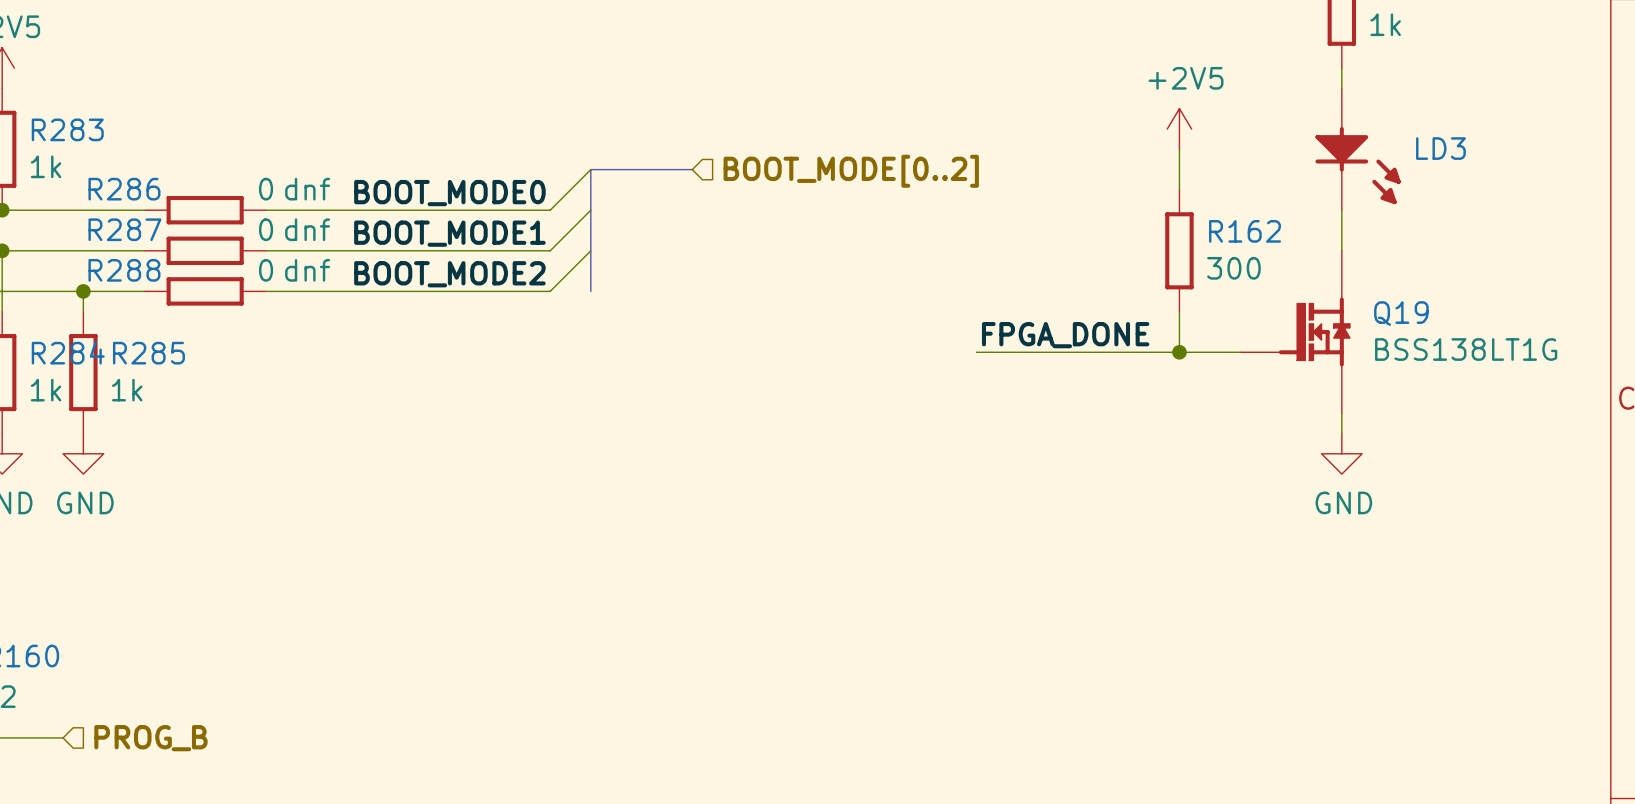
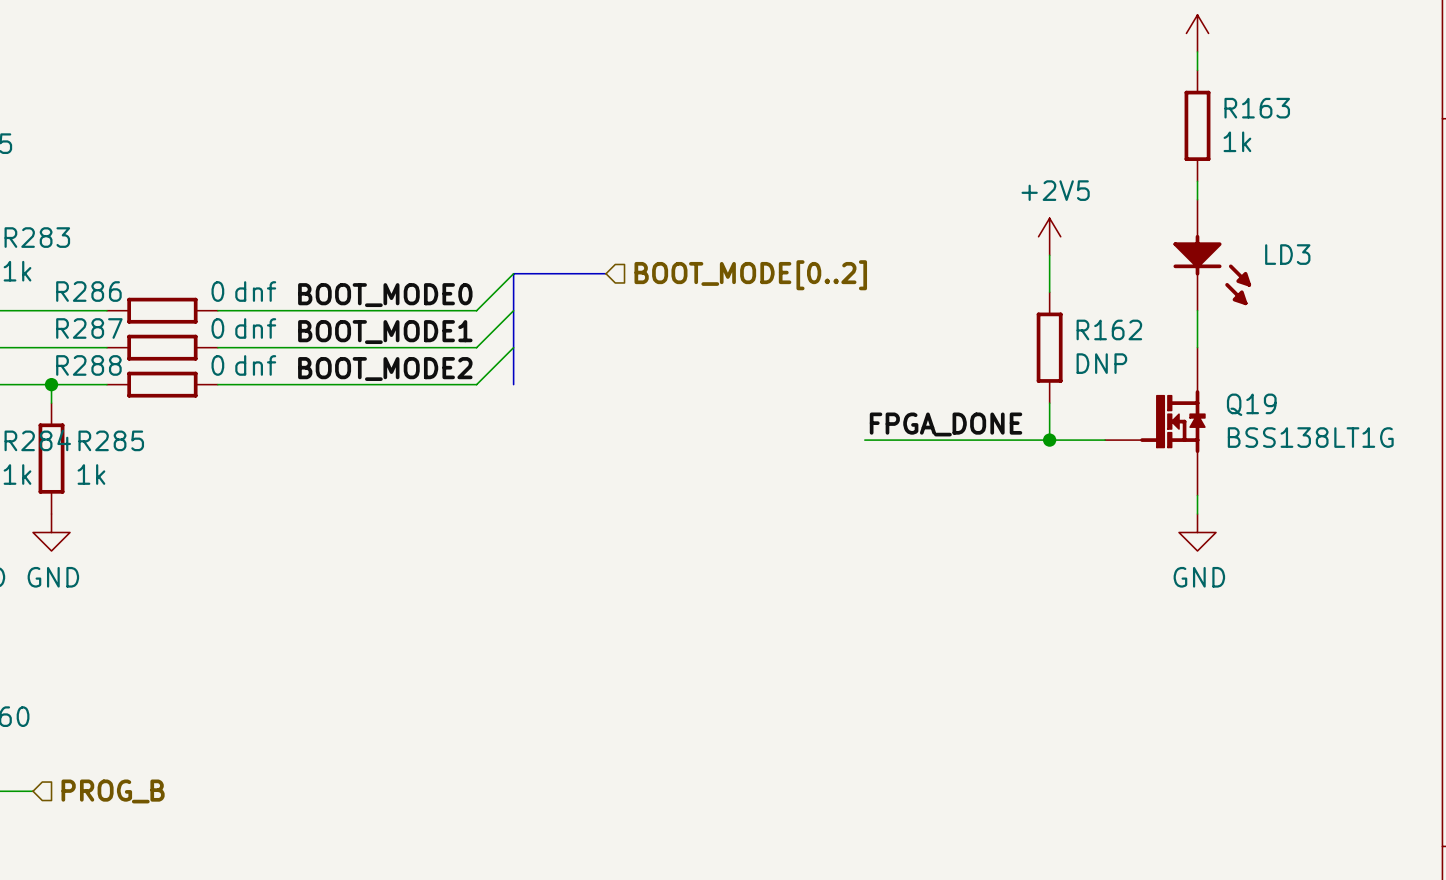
R162 text: 300 (1233, 268) -> none
R162 text: none -> DNP (1101, 363)

